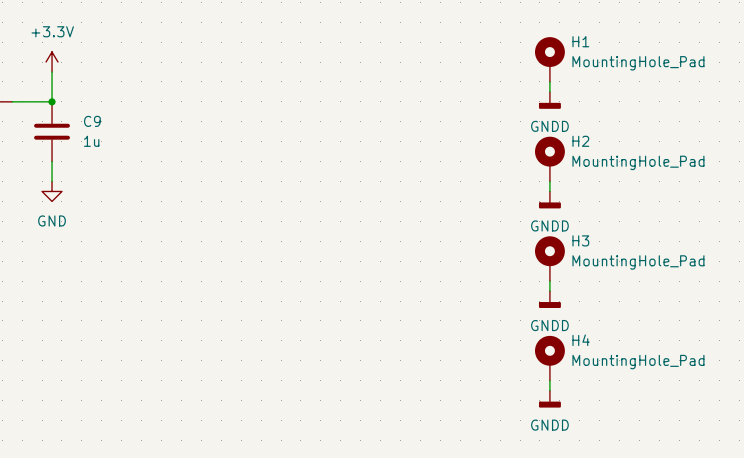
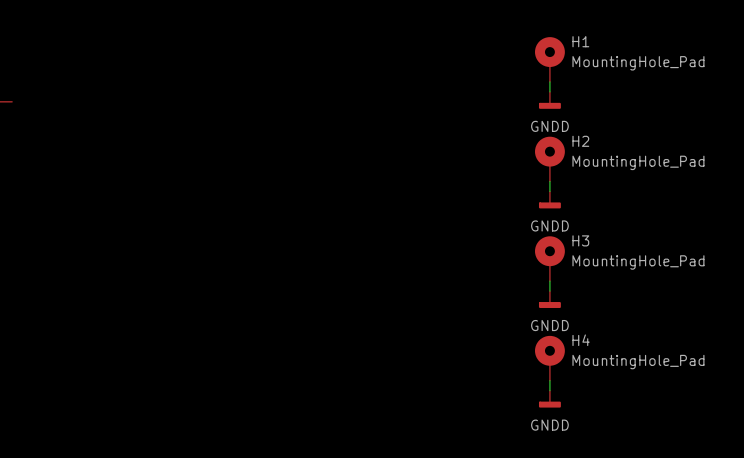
power symbol: +3.3V (52, 62) -> none
wire: (52, 71) (52, 101) (12, 101) -> none
junction: (52, 101) -> none
C9: 1u (52, 131) -> none
wire: (52, 161) (52, 181) -> none
power symbol: GND (52, 191) -> none

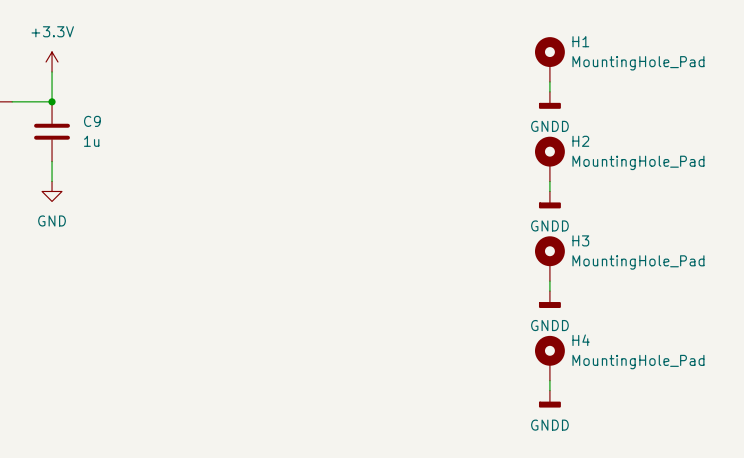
power symbol: none -> +3.3V (52, 62)
wire: none -> (52, 71) (52, 101) (12, 101)
junction: none -> (52, 101)
C9: none -> 1u (52, 131)
wire: none -> (52, 161) (52, 181)
power symbol: none -> GND (52, 191)

